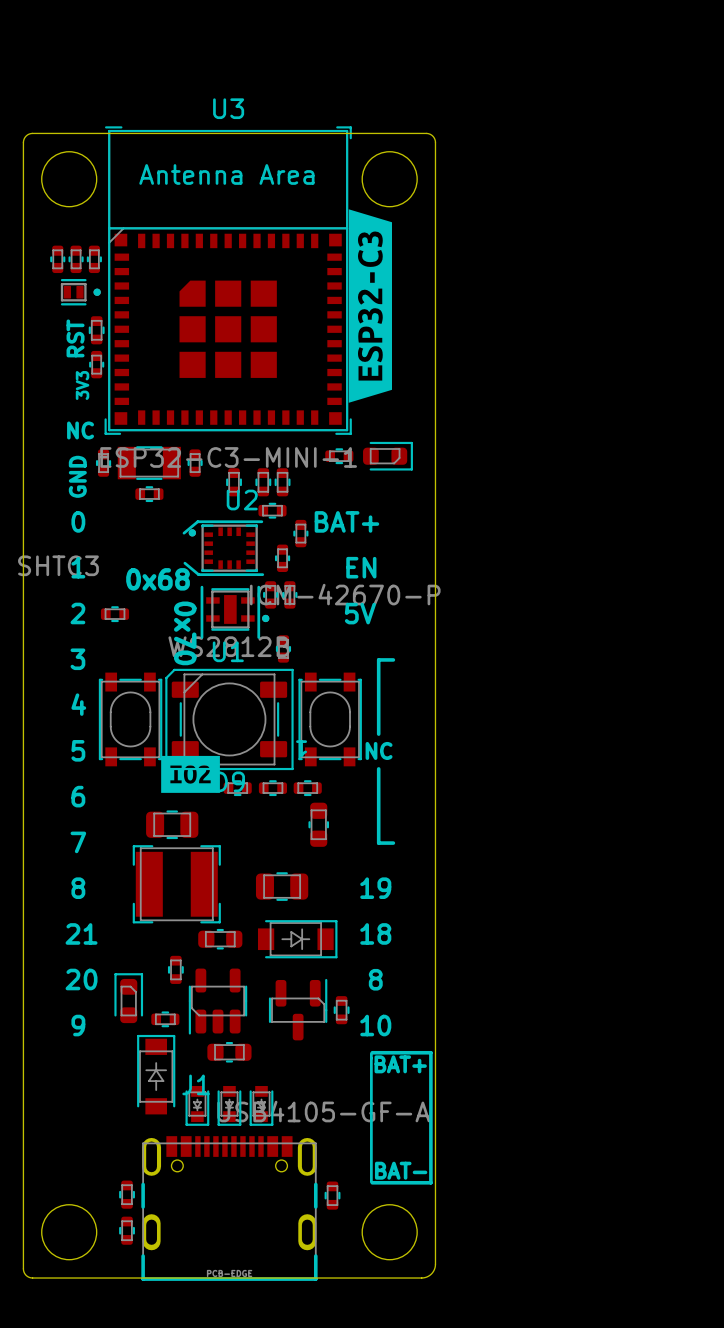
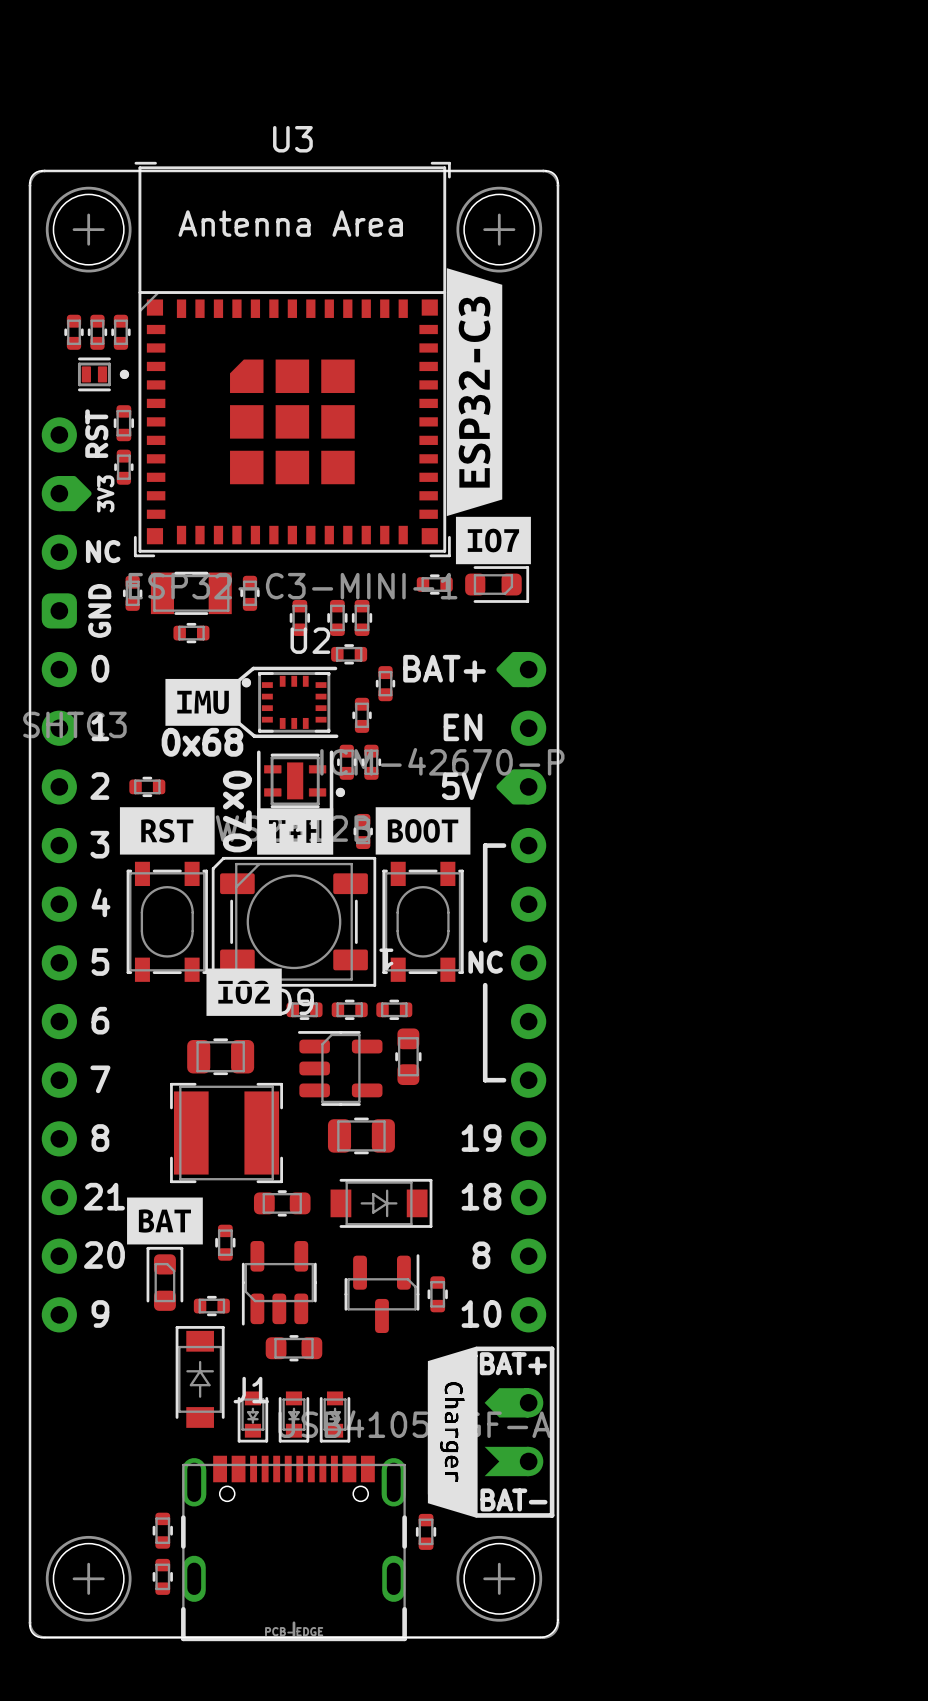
drawing: none -> [455, 516, 531, 565]
drawing: none -> [165, 678, 241, 726]
drawing: none -> [119, 807, 215, 855]
drawing: none -> [257, 808, 334, 855]
drawing: none -> [375, 807, 471, 855]
part: none -> (293, 904)
part: none -> (340, 1068)
drawing: none -> [127, 1197, 203, 1245]
drawing: none -> [427, 1346, 477, 1518]

